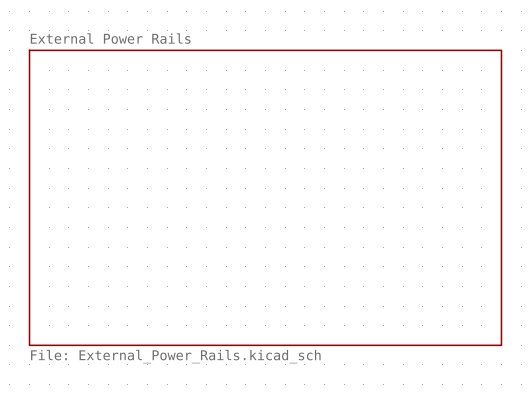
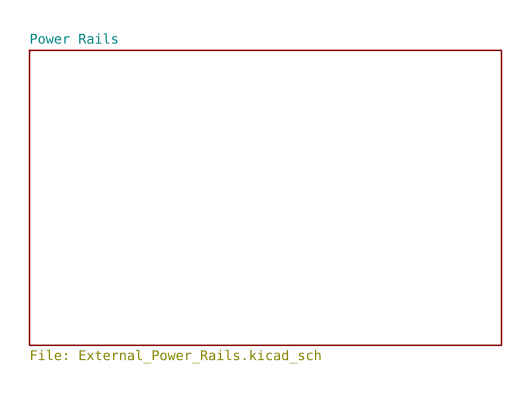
sheet External Power Rails name: External Power Rails (110, 38) -> Power Rails (74, 38)

